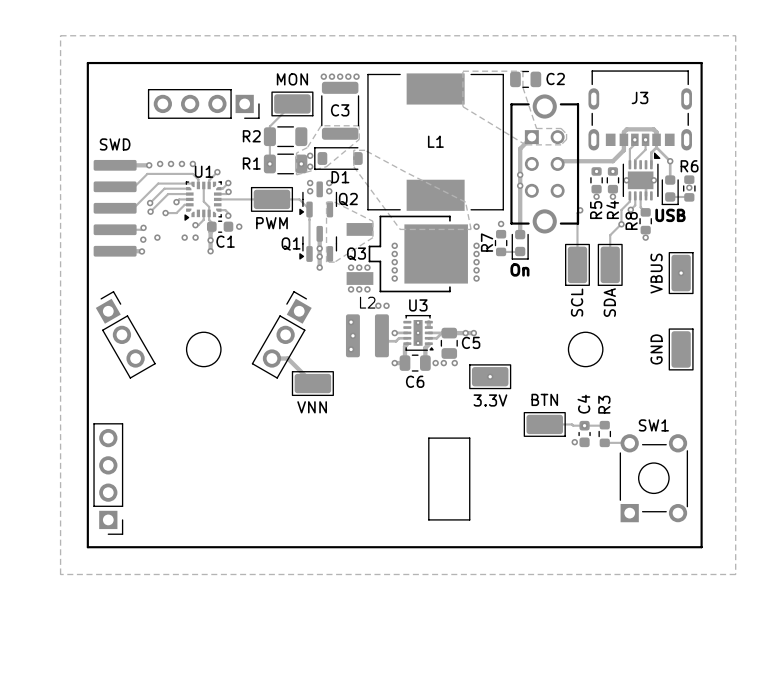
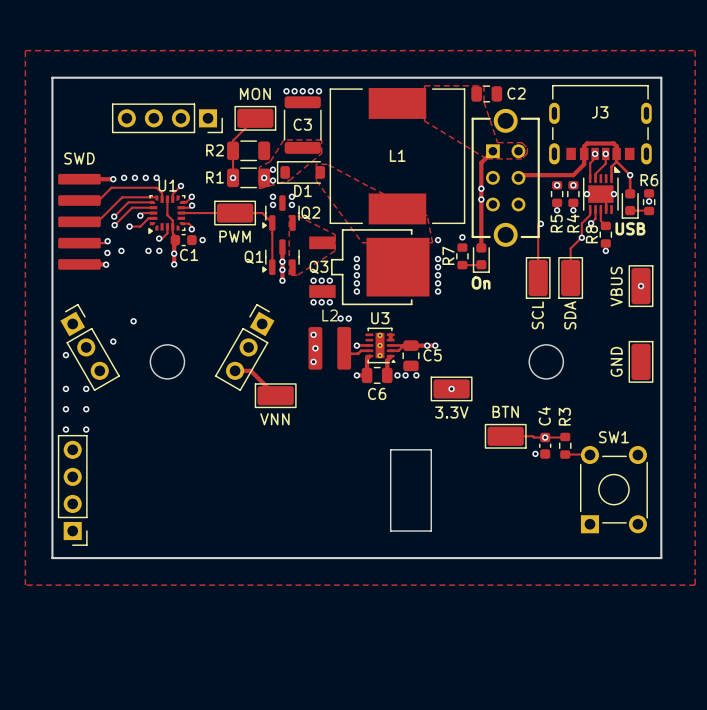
via: none -> (133, 321)
via: none -> (113, 341)
via: none -> (65, 355)
via: none -> (65, 388)
via: none -> (86, 388)
via: none -> (65, 409)
via: none -> (86, 409)
via: none -> (65, 429)
via: none -> (86, 429)

